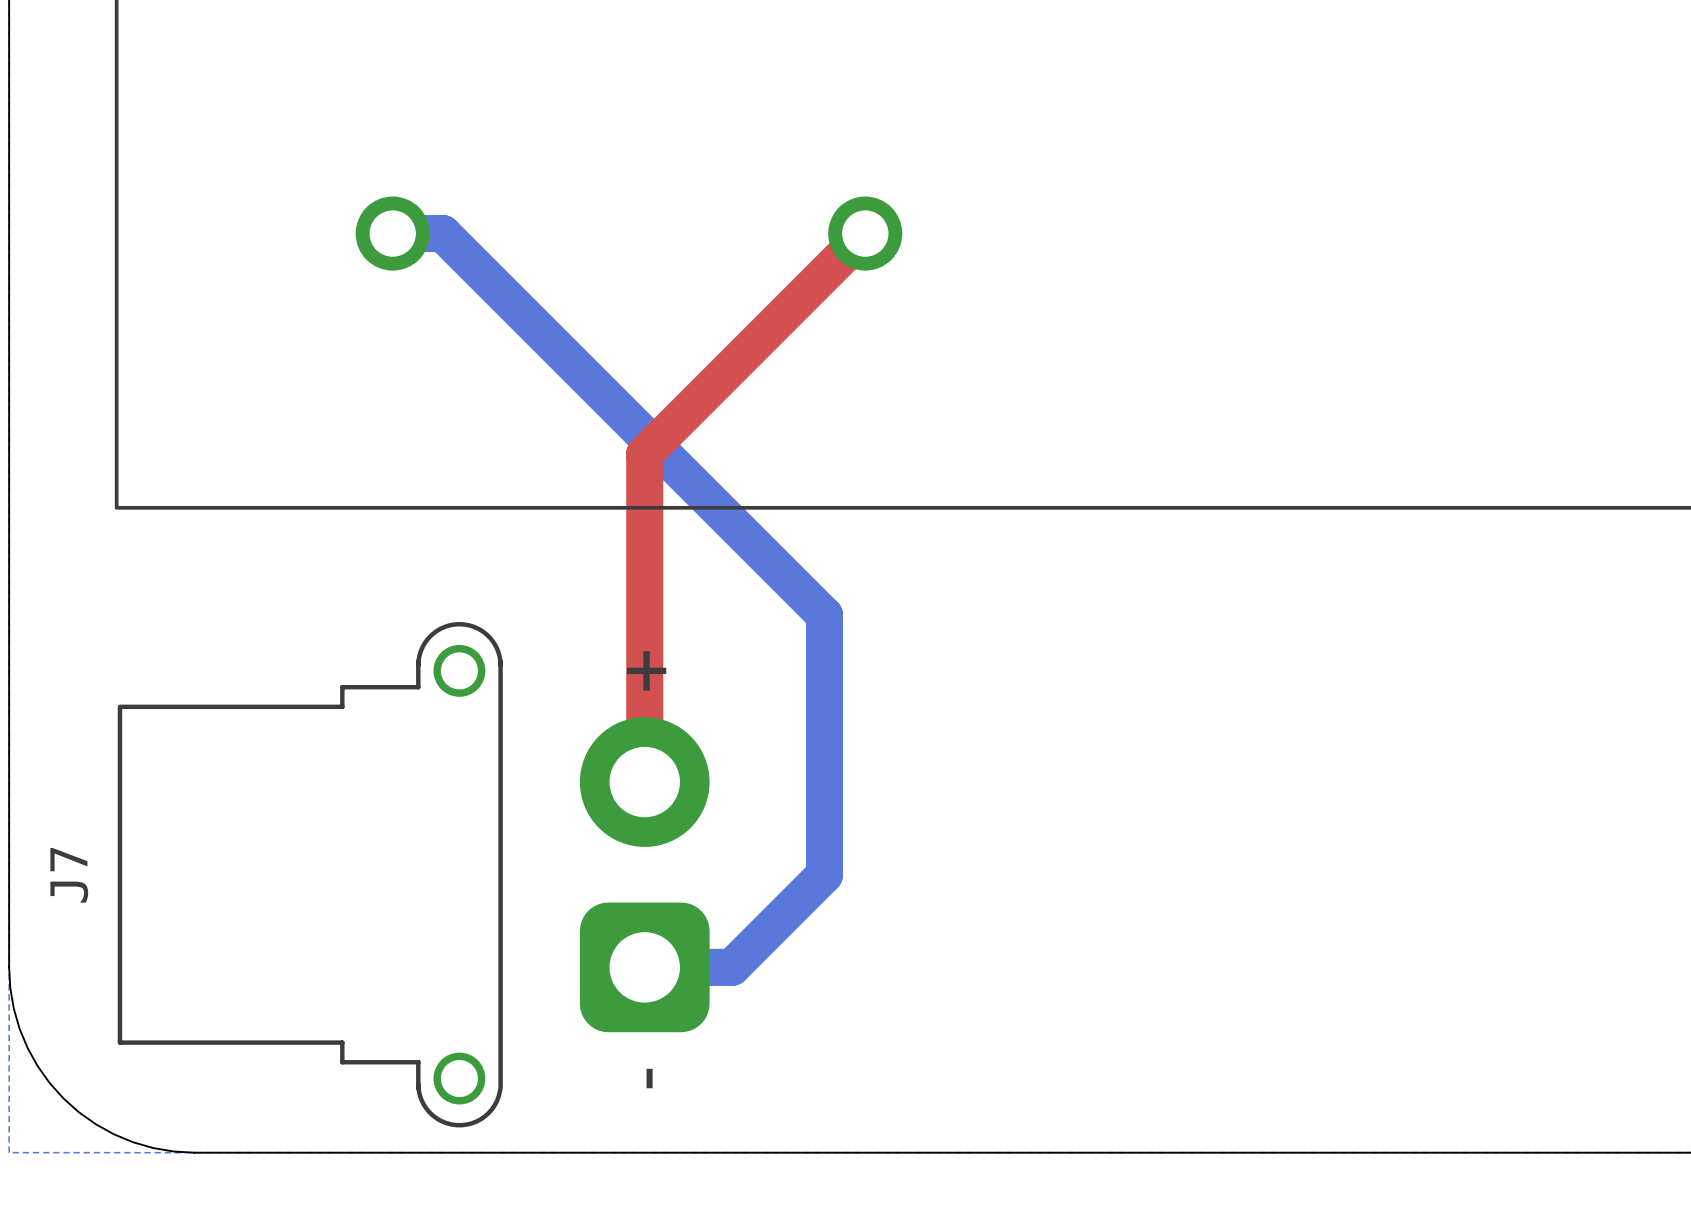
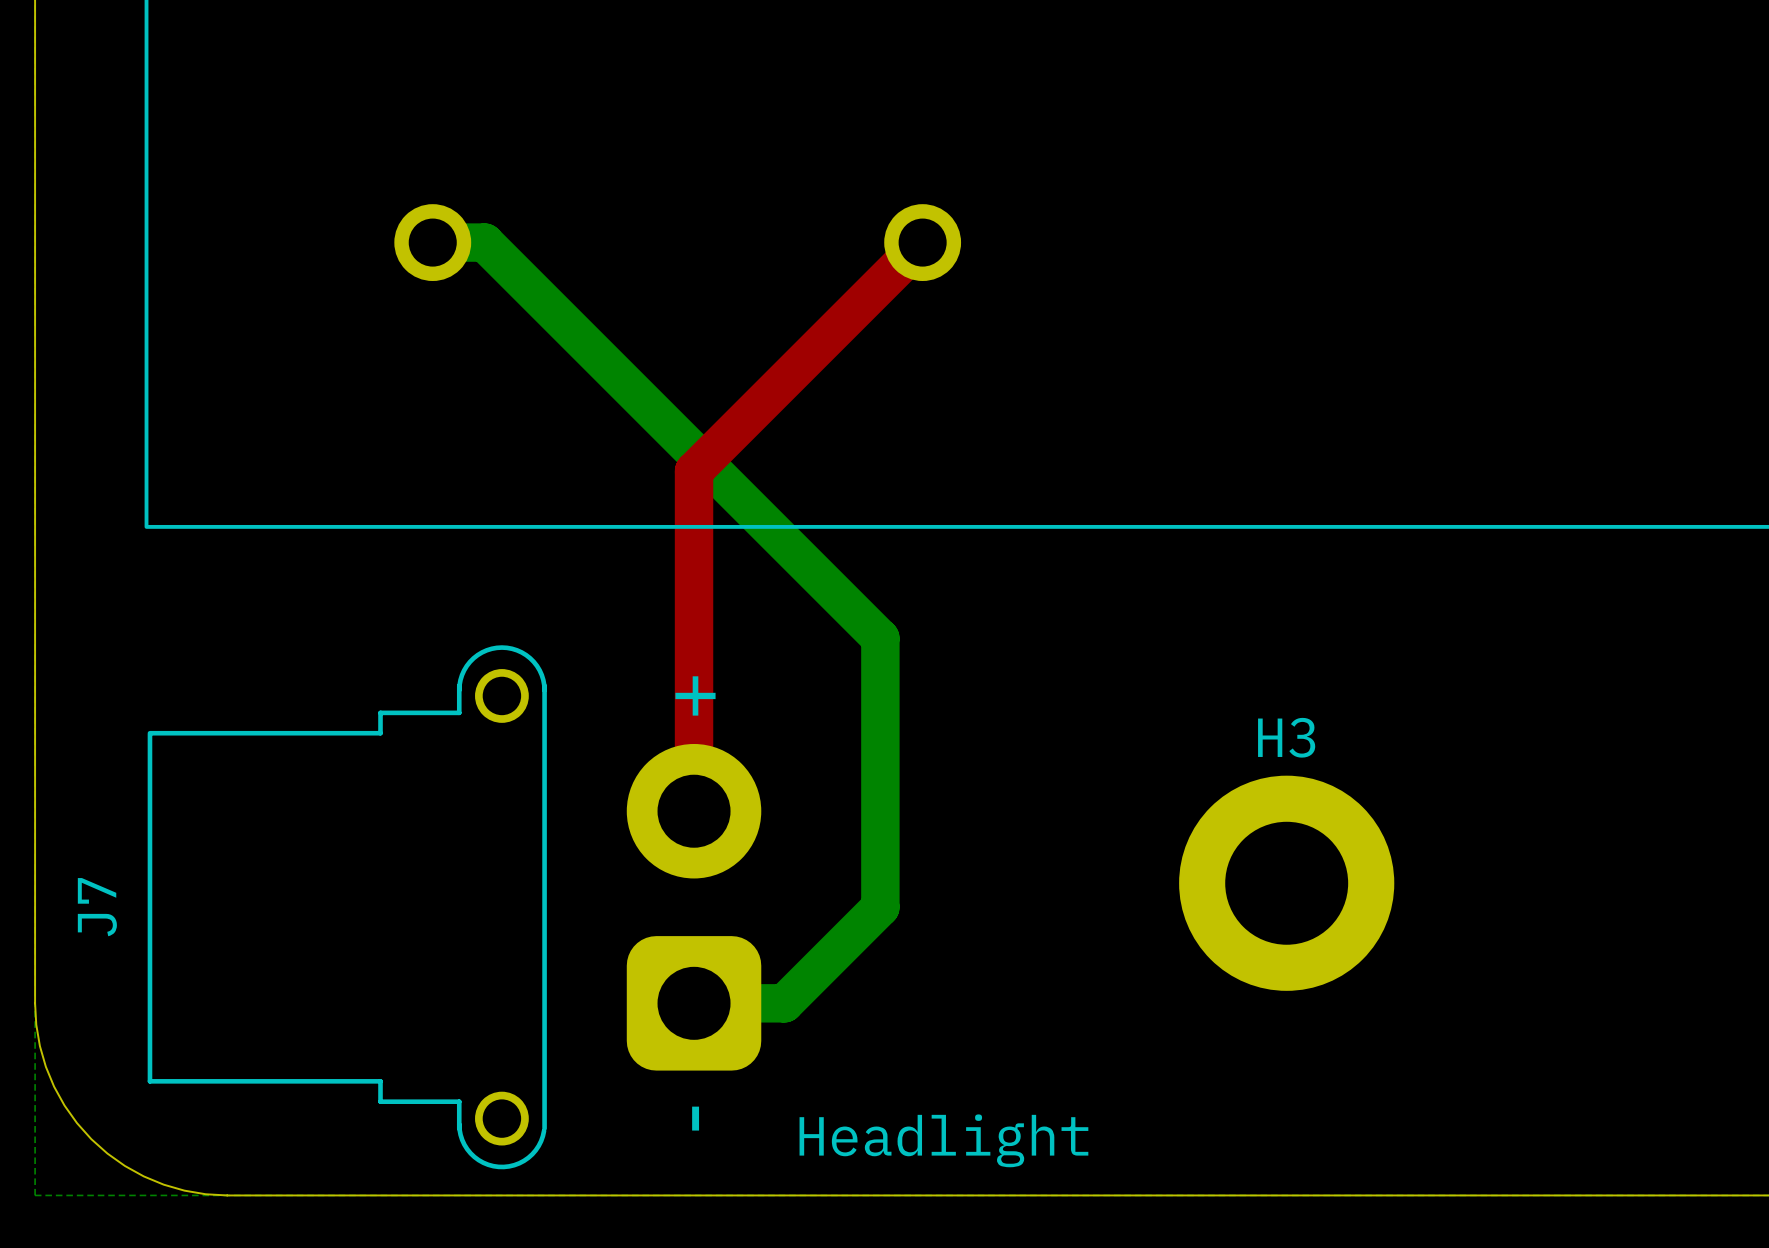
H3: none -> (1286, 883)
J7 value: none -> Headlight (943, 1140)

